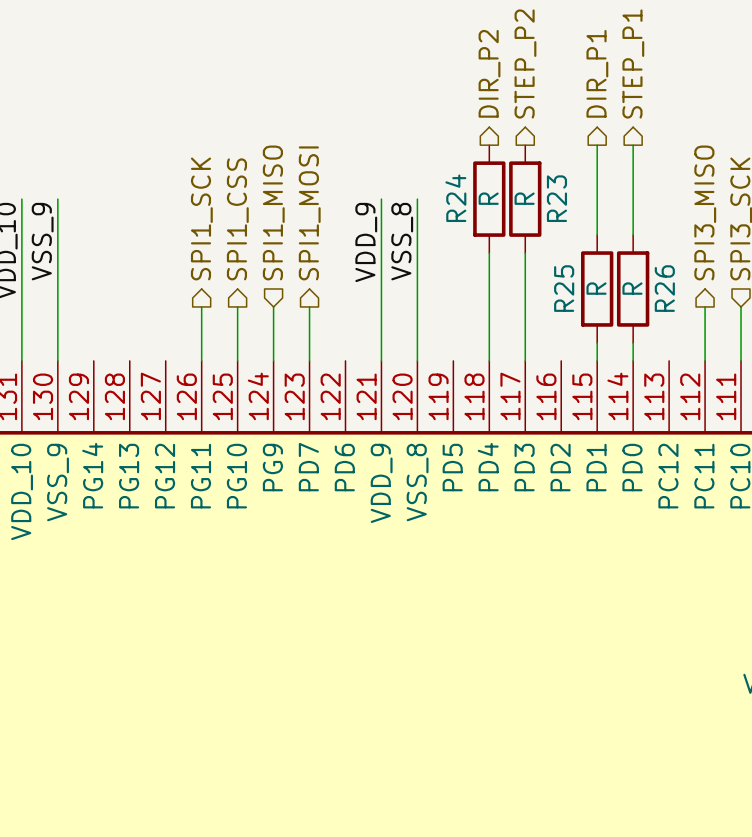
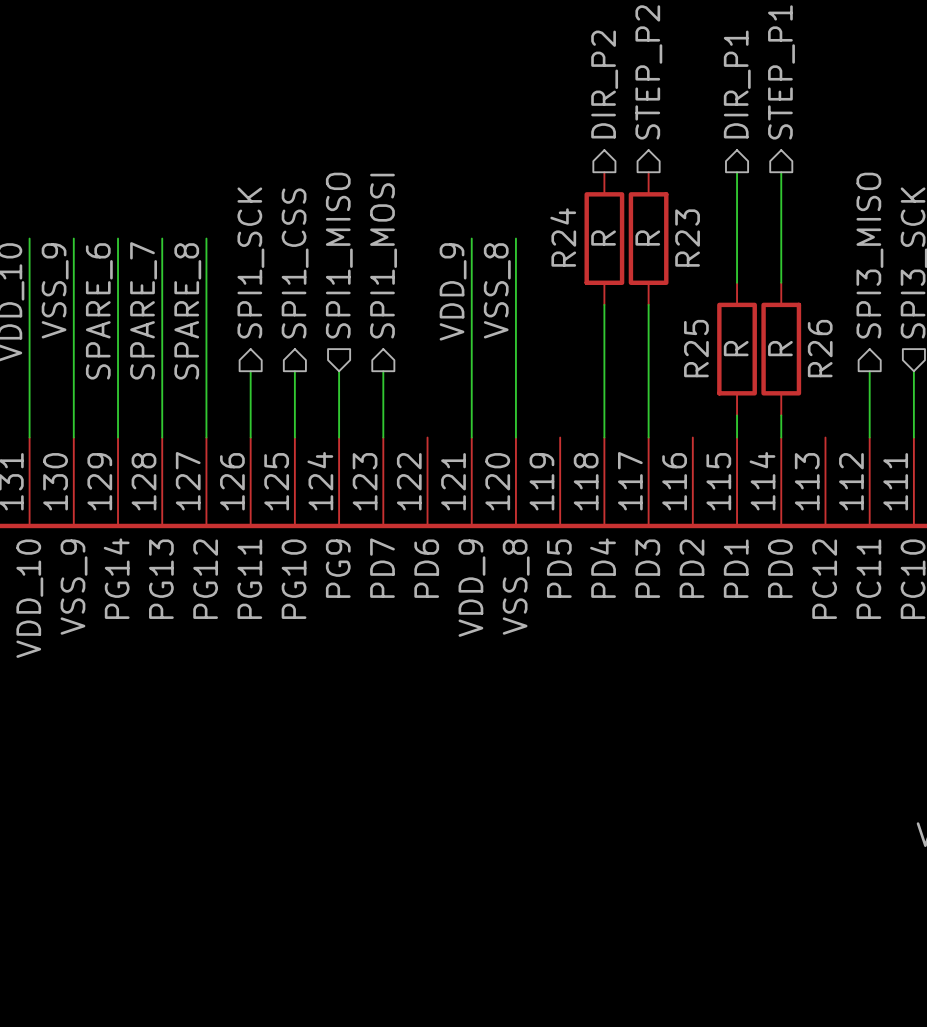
wire: none -> (118, 238) (118, 437)
wire: none -> (162, 238) (162, 437)
wire: none -> (206, 238) (206, 437)
label: none -> SPARE_7 (143, 310)
label: none -> SPARE_6 (99, 311)
label: none -> SPARE_8 (187, 311)

